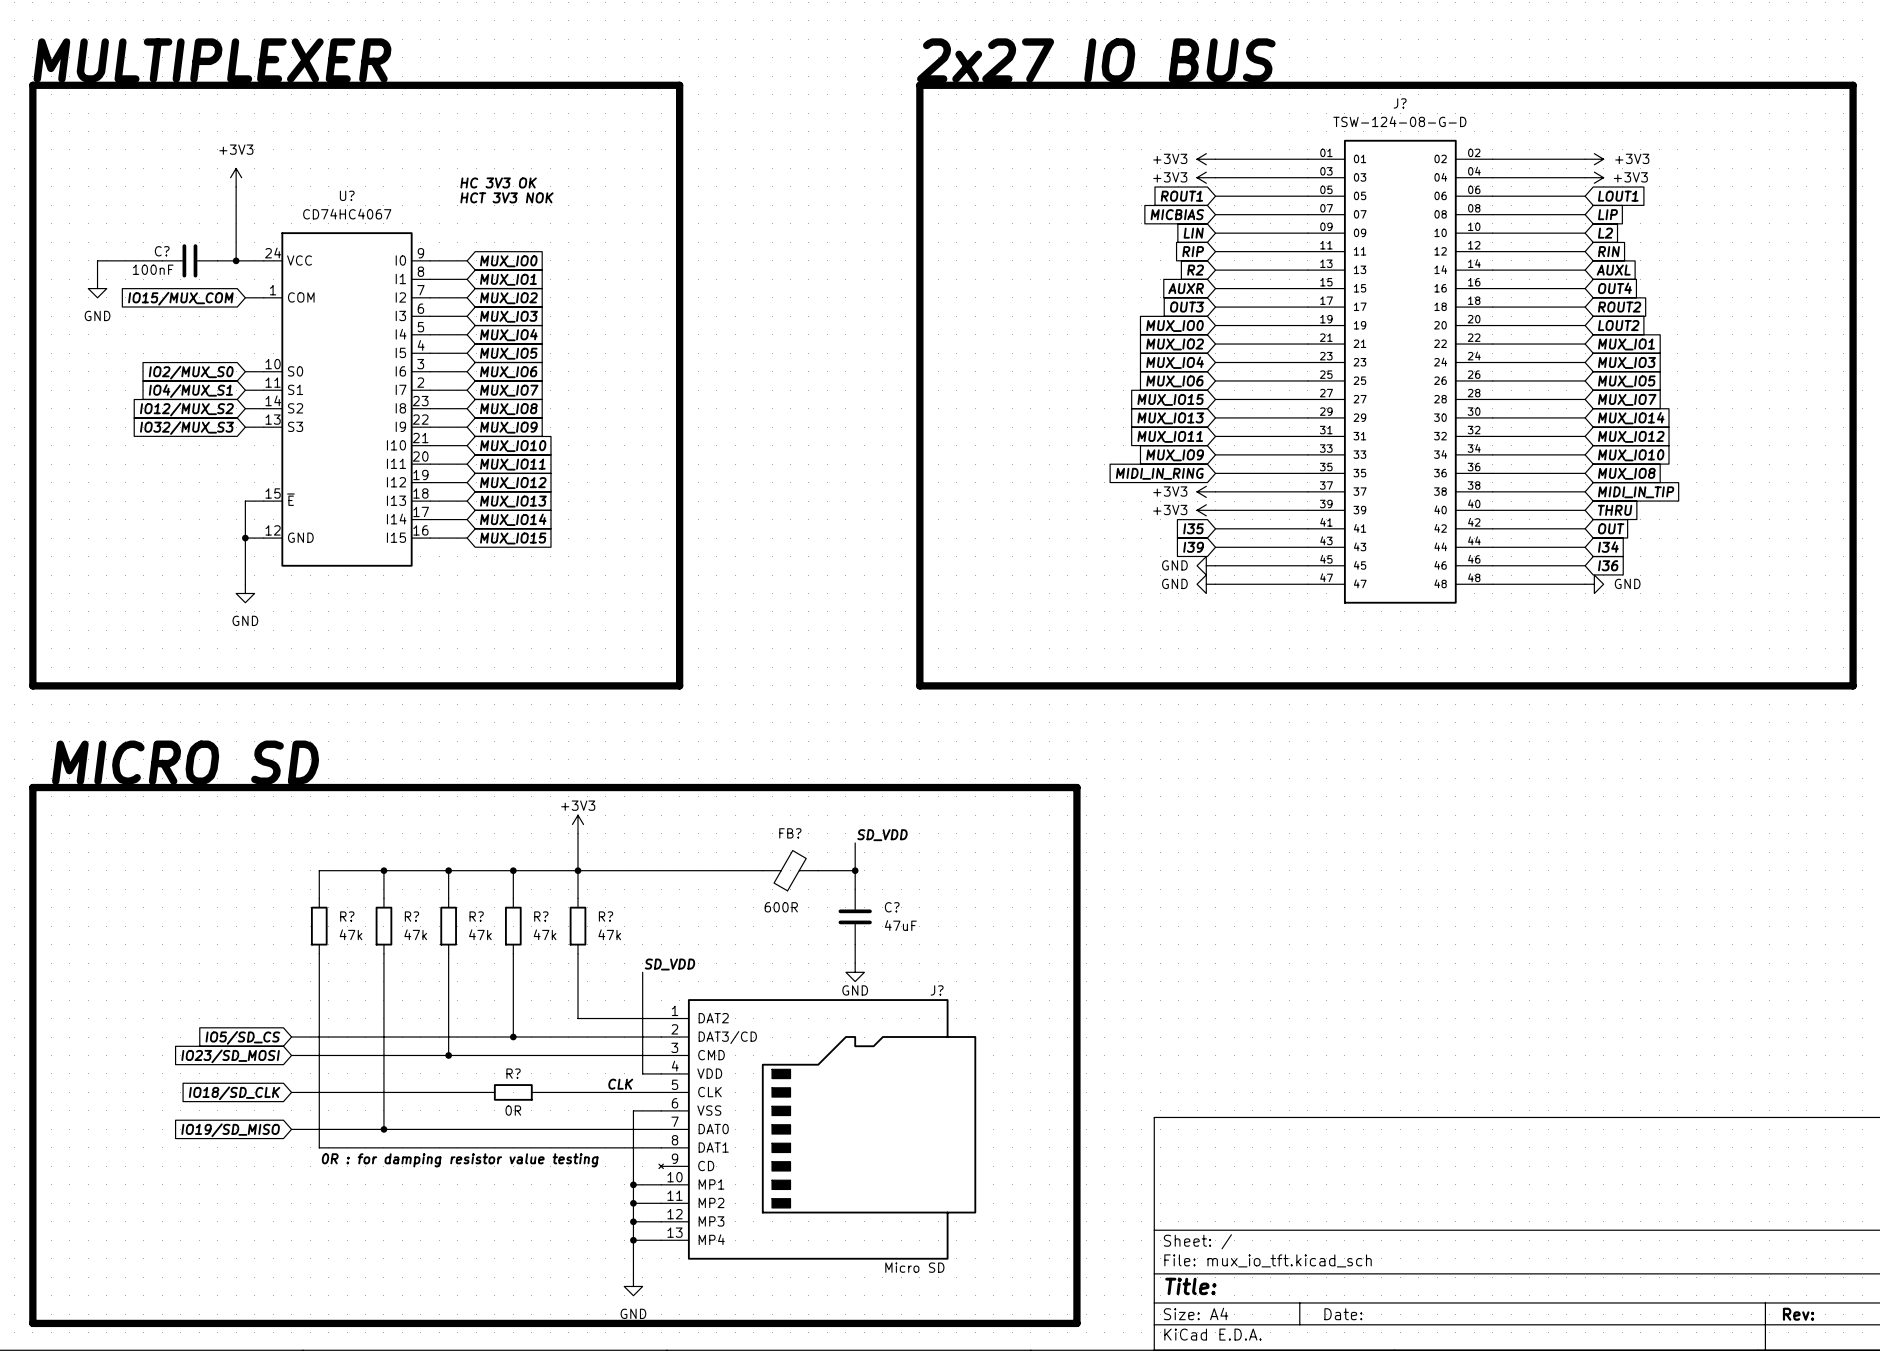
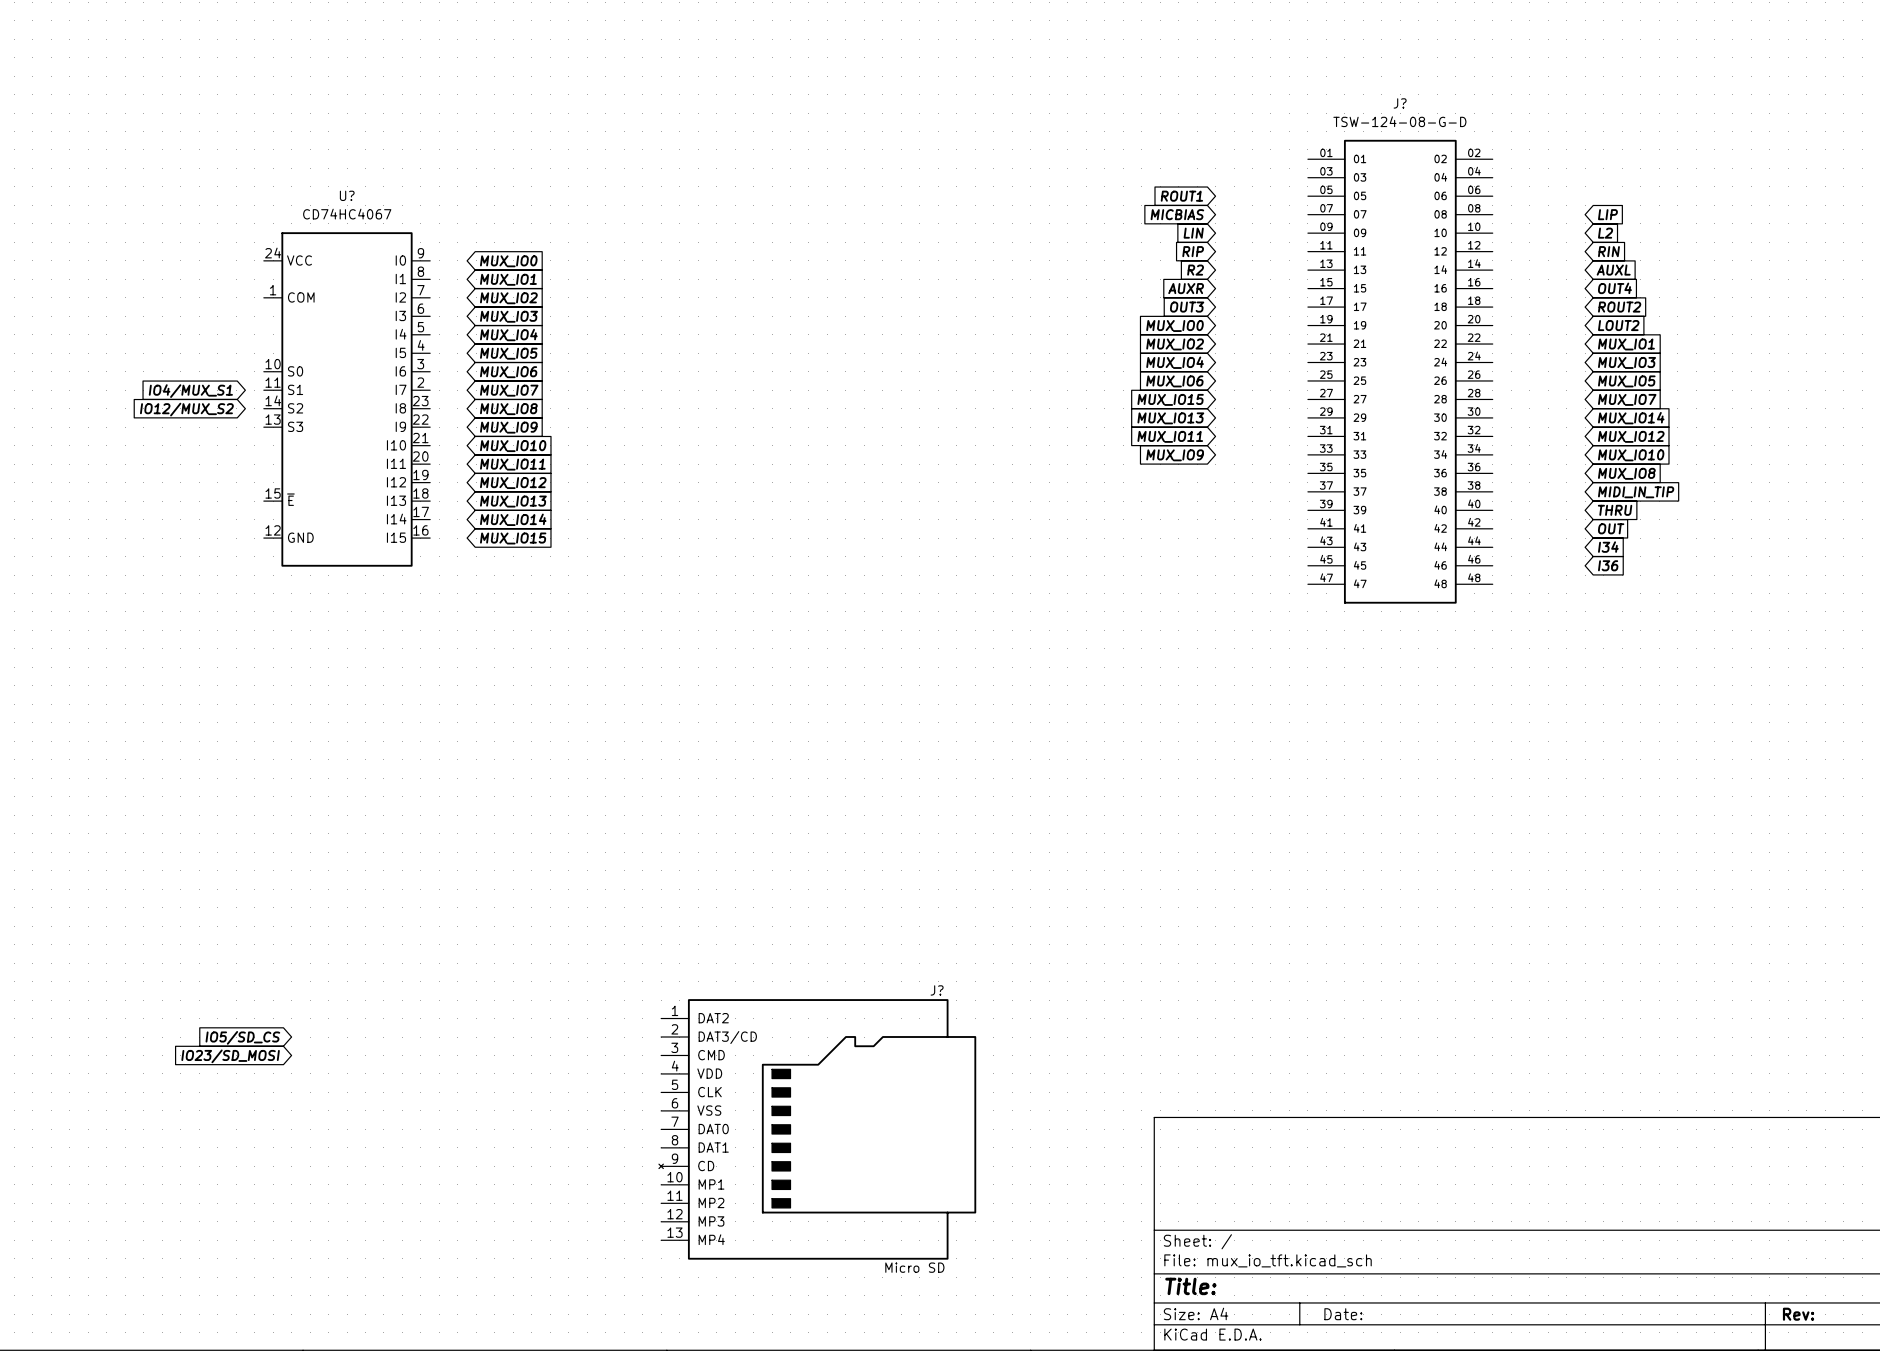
text: MULTIPLEXER (212, 60) -> none
text: 2x27 IO BUS (1096, 60) -> none
line: (32, 85) (679, 85) (679, 685) (32, 685) (32, 85) -> none
line: (919, 85) (1853, 85) (1853, 685) (919, 685) (919, 85) -> none
power symbol: +3V3 (1206, 159) -> none
wire: (1215, 159) (1307, 159) -> none
wire: (1492, 159) (1585, 159) -> none
power symbol: +3V3 (1594, 159) -> none
power symbol: +3V3 (236, 177) -> none
power symbol: +3V3 (1206, 177) -> none
wire: (1215, 177) (1307, 177) -> none
wire: (1492, 177) (1585, 177) -> none
power symbol: +3V3 (1594, 177) -> none
text: HC 3V3 OK (498, 182) -> none
wire: (236, 186) (236, 260) -> none
wire: (1215, 196) (1307, 196) -> none
wire: (1492, 196) (1585, 196) -> none
global label: LOUT1 (1618, 196) -> none
text: HCT 3V3 NOK (506, 197) -> none
wire: (1215, 214) (1307, 214) -> none
wire: (1492, 214) (1585, 214) -> none
wire: (1215, 233) (1307, 233) -> none
wire: (1492, 233) (1585, 233) -> none
wire: (1215, 251) (1307, 251) -> none
wire: (1492, 251) (1585, 251) -> none
wire: (162, 260) (97, 260) (97, 279) -> none
C?: 100nF (189, 260) -> none
wire: (217, 260) (263, 260) -> none
junction: (236, 260) -> none
wire: (430, 260) (467, 260) -> none
wire: (1215, 270) (1307, 270) -> none
wire: (1492, 270) (1585, 270) -> none
wire: (430, 279) (467, 279) -> none
power symbol: GND (97, 288) -> none
wire: (1215, 288) (1307, 288) -> none
wire: (1492, 288) (1585, 288) -> none
wire: (245, 297) (263, 297) -> none
wire: (430, 297) (467, 297) -> none
global label: IO15/MUX_COM (180, 298) -> none
wire: (1215, 307) (1307, 307) -> none
wire: (1492, 307) (1585, 307) -> none
wire: (430, 316) (467, 316) -> none
wire: (1215, 325) (1307, 325) -> none
wire: (1492, 325) (1585, 325) -> none
wire: (430, 334) (467, 334) -> none
wire: (1215, 344) (1307, 344) -> none
wire: (1492, 344) (1585, 344) -> none
wire: (430, 353) (467, 353) -> none
wire: (1215, 362) (1307, 362) -> none
wire: (1492, 362) (1585, 362) -> none
wire: (245, 371) (263, 371) -> none
wire: (430, 371) (467, 371) -> none
global label: IO2/MUX_S0 (191, 372) -> none
wire: (1215, 380) (1307, 380) -> none
wire: (1492, 380) (1585, 380) -> none
wire: (245, 390) (263, 390) -> none
wire: (430, 390) (467, 390) -> none
wire: (1215, 399) (1307, 399) -> none
wire: (1492, 399) (1585, 399) -> none
wire: (245, 408) (263, 408) -> none
wire: (430, 408) (467, 408) -> none
wire: (1215, 417) (1307, 417) -> none
wire: (1492, 417) (1585, 417) -> none
wire: (245, 427) (263, 427) -> none
wire: (430, 427) (467, 427) -> none
global label: IO32/MUX_S3 (187, 428) -> none
wire: (1215, 436) (1307, 436) -> none
wire: (1492, 436) (1585, 436) -> none
wire: (430, 445) (467, 445) -> none
wire: (1215, 454) (1307, 454) -> none
wire: (1492, 454) (1585, 454) -> none
wire: (430, 464) (467, 464) -> none
global label: MIDI_IN_RING (1159, 473) -> none
wire: (1215, 473) (1307, 473) -> none
wire: (1492, 473) (1585, 473) -> none
wire: (430, 482) (467, 482) -> none
power symbol: +3V3 (1206, 491) -> none
wire: (1215, 491) (1307, 491) -> none
wire: (1492, 491) (1585, 491) -> none
wire: (263, 501) (245, 501) (245, 584) -> none
wire: (430, 501) (467, 501) -> none
power symbol: +3V3 (1206, 510) -> none
wire: (1215, 510) (1307, 510) -> none
wire: (1492, 510) (1585, 510) -> none
wire: (430, 519) (467, 519) -> none
global label: I35 (1193, 528) -> none
wire: (1215, 528) (1307, 528) -> none
wire: (1492, 528) (1585, 528) -> none
wire: (245, 538) (263, 538) -> none
junction: (245, 538) -> none
wire: (430, 538) (467, 538) -> none
global label: I39 (1193, 547) -> none
wire: (1215, 547) (1307, 547) -> none
wire: (1492, 547) (1585, 547) -> none
power symbol: GND (1206, 565) -> none
wire: (1215, 565) (1307, 565) -> none
wire: (1492, 565) (1585, 565) -> none
power symbol: GND (1206, 584) -> none
wire: (1215, 584) (1307, 584) -> none
wire: (1492, 584) (1585, 584) -> none
power symbol: GND (1594, 584) -> none
power symbol: GND (245, 593) -> none
text: MICRO SD (185, 762) -> none
line: (32, 787) (1076, 787) (1076, 1323) (32, 1323) (32, 787) -> none
power symbol: +3V3 (578, 824) -> none
wire: (578, 833) (578, 898) -> none
label: SD_VDD (882, 835) -> none
wire: (855, 842) (855, 889) -> none
wire: (383, 870) (383, 898) -> none
junction: (383, 870) -> none
wire: (448, 870) (448, 898) -> none
junction: (448, 870) -> none
wire: (513, 870) (513, 898) -> none
junction: (513, 870) -> none
junction: (578, 870) -> none
wire: (762, 870) (319, 870) (319, 898) -> none
FB?: 600R (790, 870) -> none
wire: (818, 870) (855, 870) -> none
junction: (855, 870) -> none
C?: 47uF (855, 916) -> none
R?: 47k (319, 926) -> none
R?: 47k (383, 926) -> none
R?: 47k (448, 926) -> none
R?: 47k (513, 926) -> none
R?: 47k (578, 926) -> none
wire: (855, 944) (855, 963) -> none
wire: (319, 953) (319, 1147) (661, 1147) -> none
wire: (383, 953) (383, 1129) -> none
wire: (448, 953) (448, 1055) -> none
wire: (513, 953) (513, 1037) -> none
wire: (578, 953) (578, 1018) (661, 1018) -> none
label: SD_VDD (669, 964) -> none
wire: (642, 972) (642, 1073) (661, 1073) -> none
power symbol: GND (855, 972) -> none
wire: (291, 1037) (661, 1037) -> none
junction: (513, 1037) -> none
wire: (291, 1055) (661, 1055) -> none
junction: (448, 1055) -> none
label: CLK (620, 1084) -> none
wire: (291, 1092) (485, 1092) -> none
R?: 0R (513, 1092) -> none
wire: (541, 1092) (661, 1092) -> none
global label: IO18/SD_CLK (234, 1093) -> none
wire: (661, 1110) (633, 1110) (633, 1277) -> none
wire: (291, 1129) (661, 1129) -> none
junction: (383, 1129) -> none
global label: IO19/SD_MISO (230, 1130) -> none
text: 0R : for damping resistor value testing (460, 1160) -> none
wire: (633, 1184) (661, 1184) -> none
junction: (633, 1184) -> none
wire: (633, 1203) (661, 1203) -> none
junction: (633, 1203) -> none
wire: (633, 1221) (661, 1221) -> none
junction: (633, 1221) -> none
wire: (633, 1240) (661, 1240) -> none
junction: (633, 1240) -> none
power symbol: GND (633, 1286) -> none

